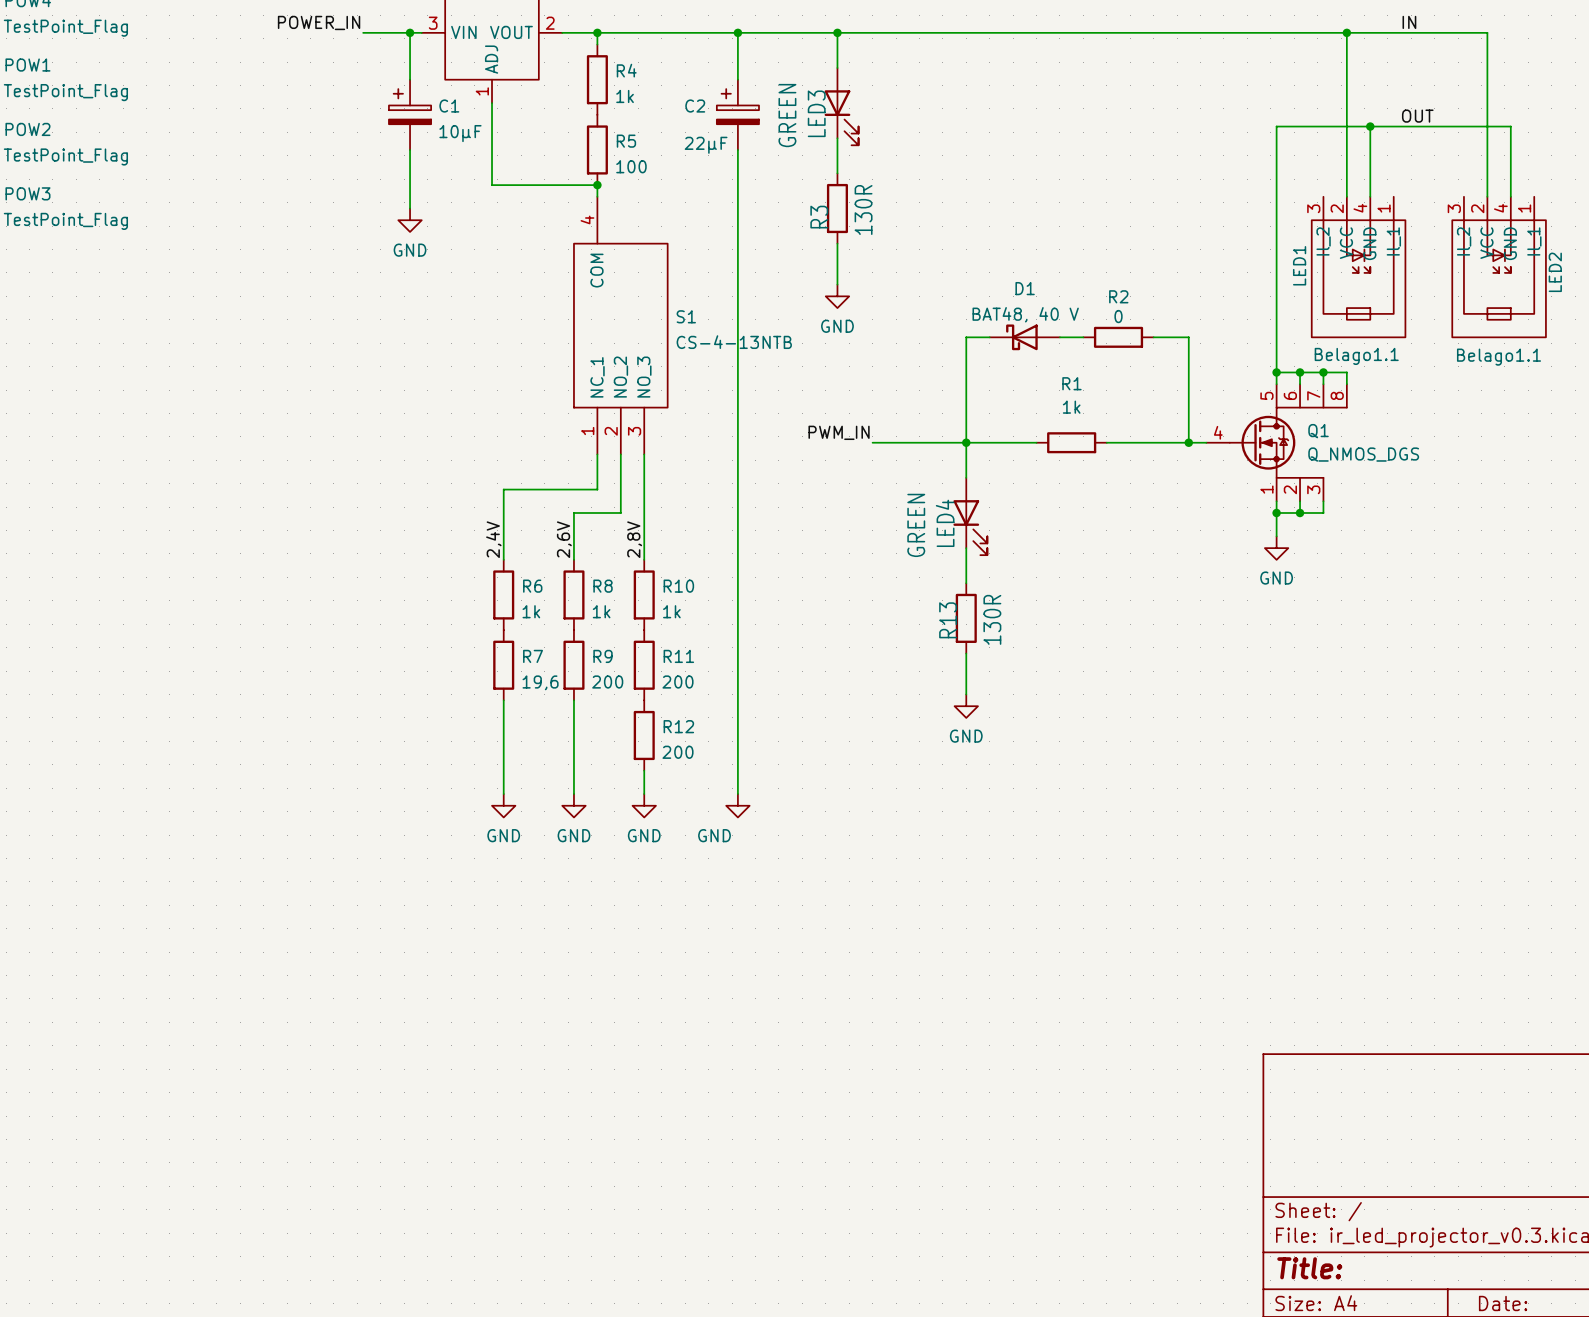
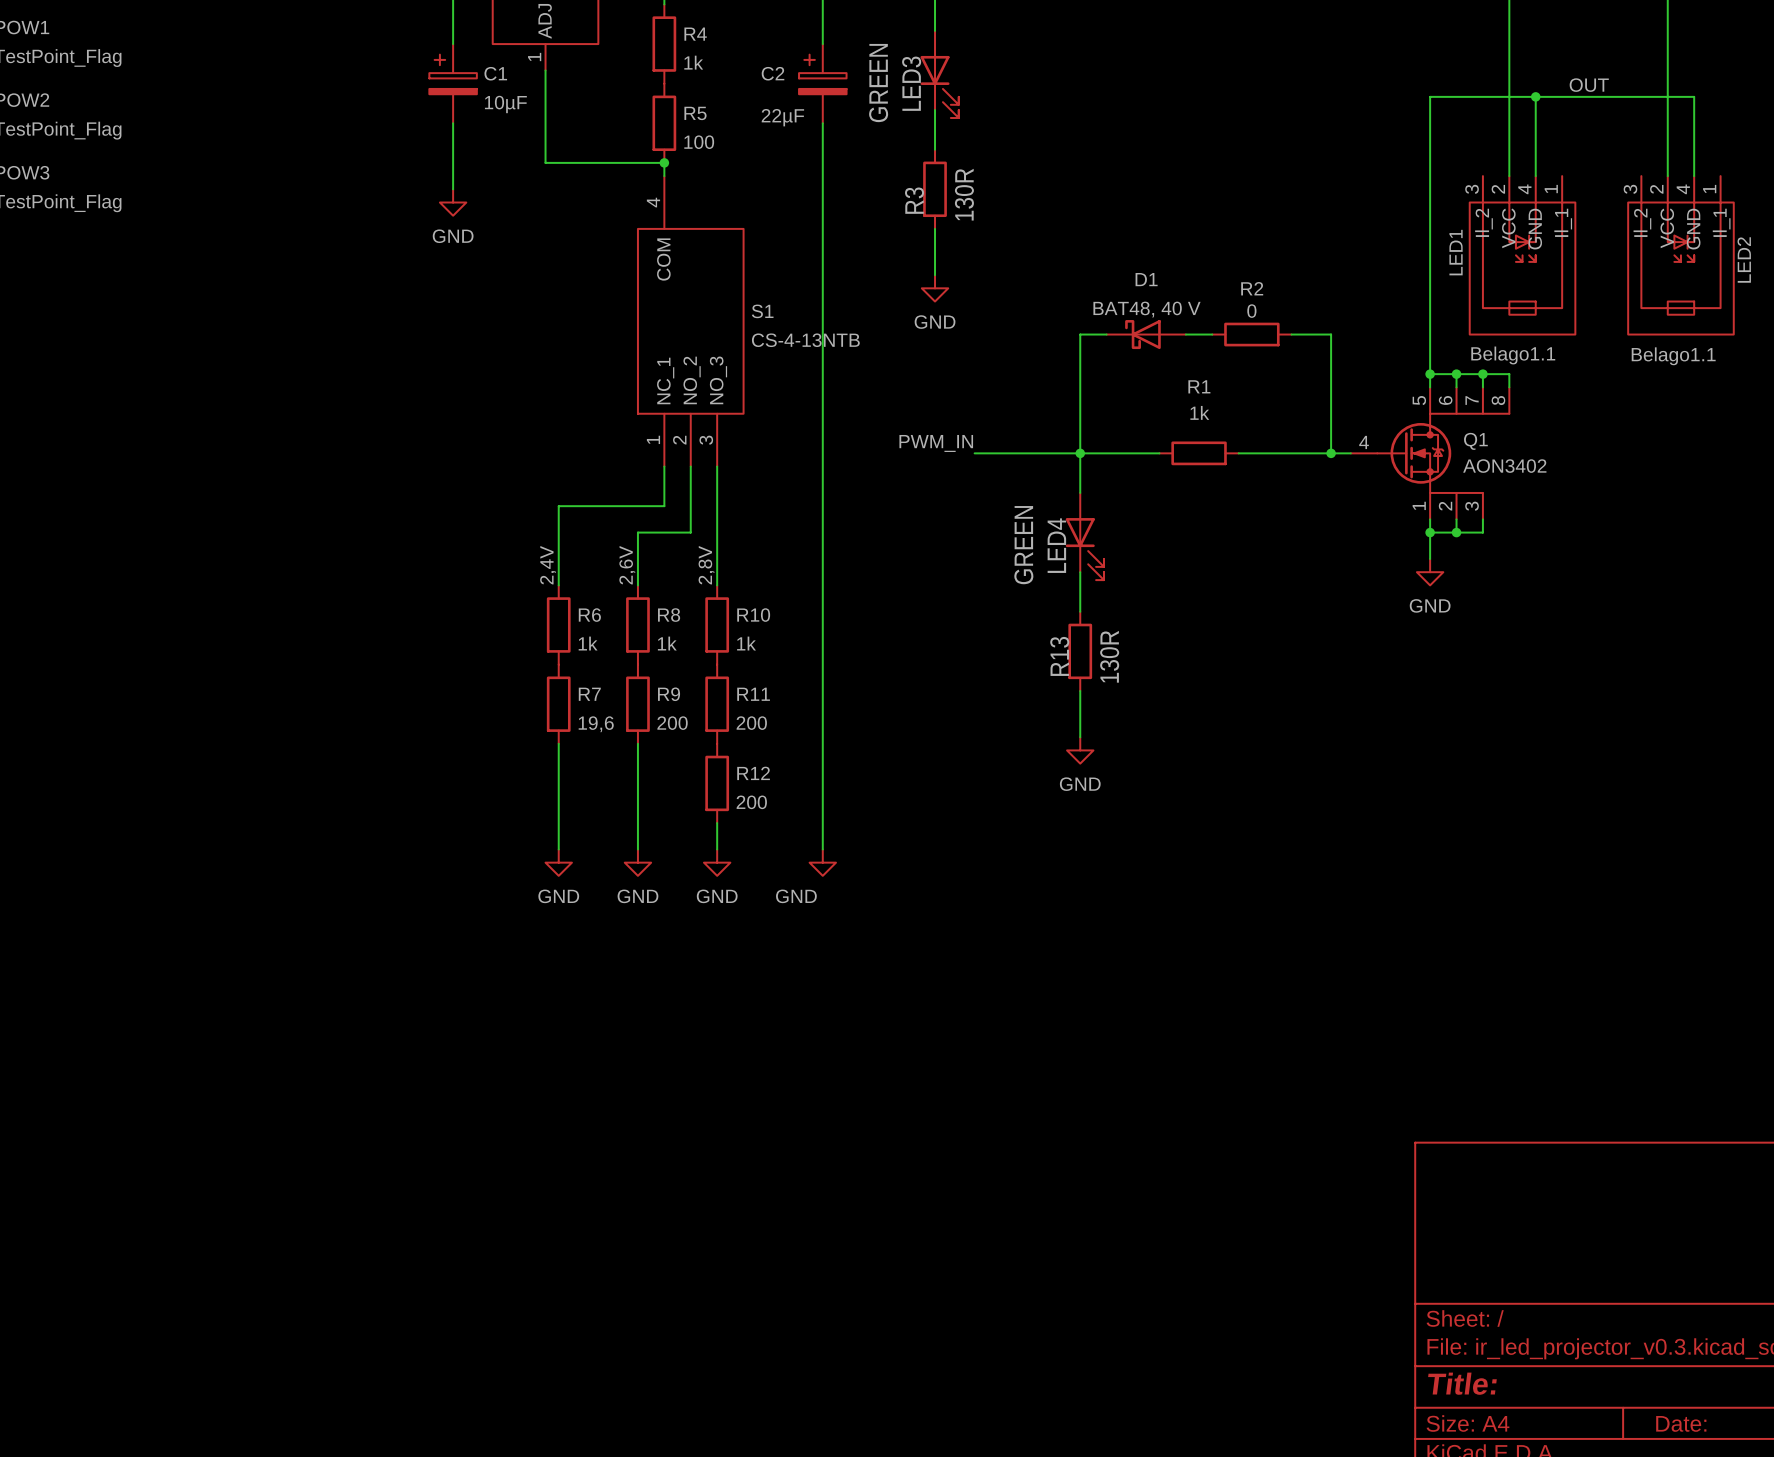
Q1 value: Q_NMOS_DGS (1363, 454) -> AON3402 (1504, 466)

